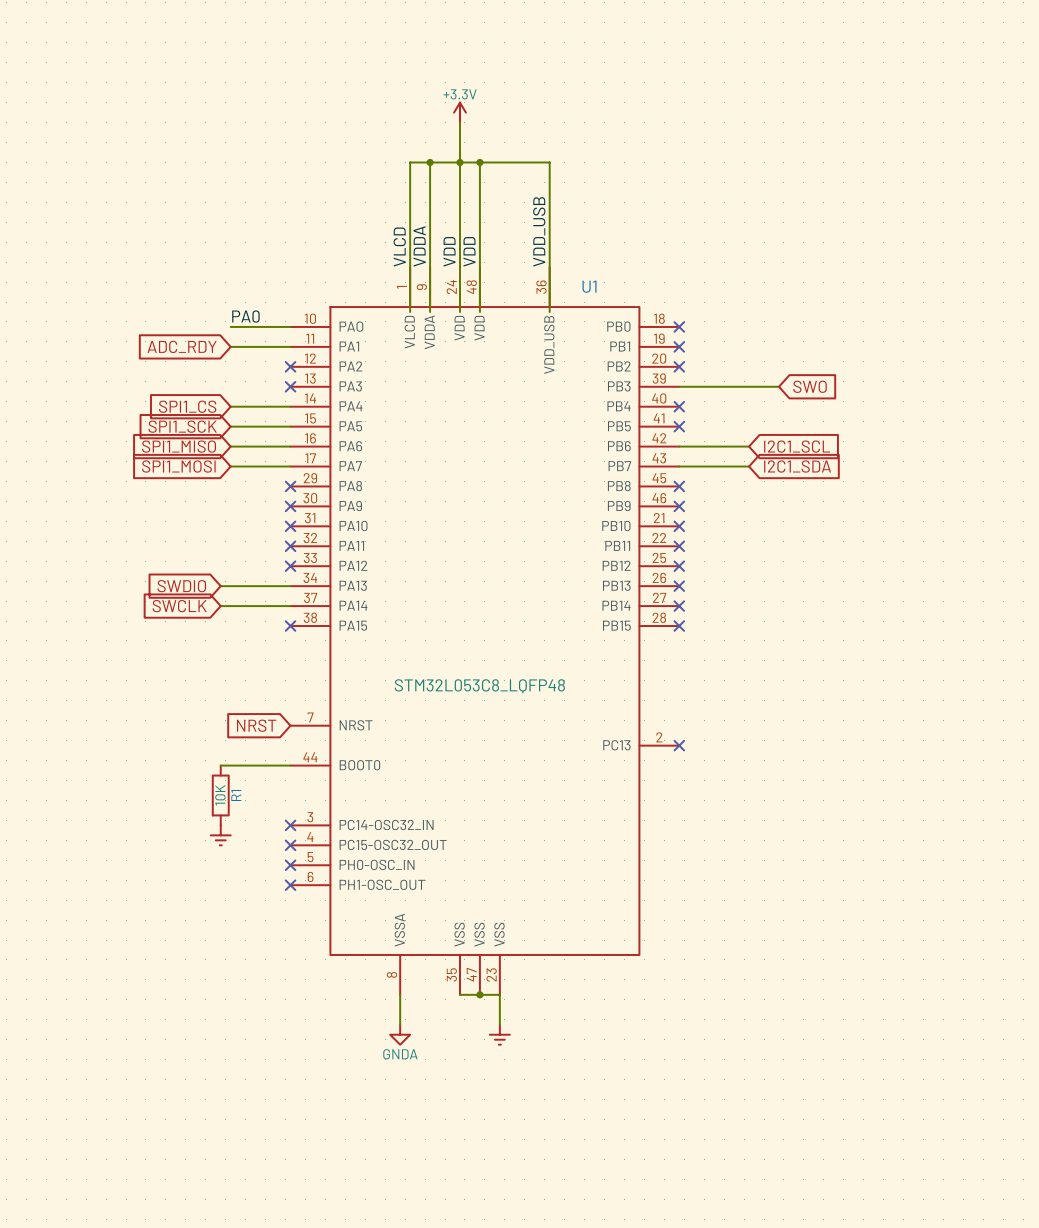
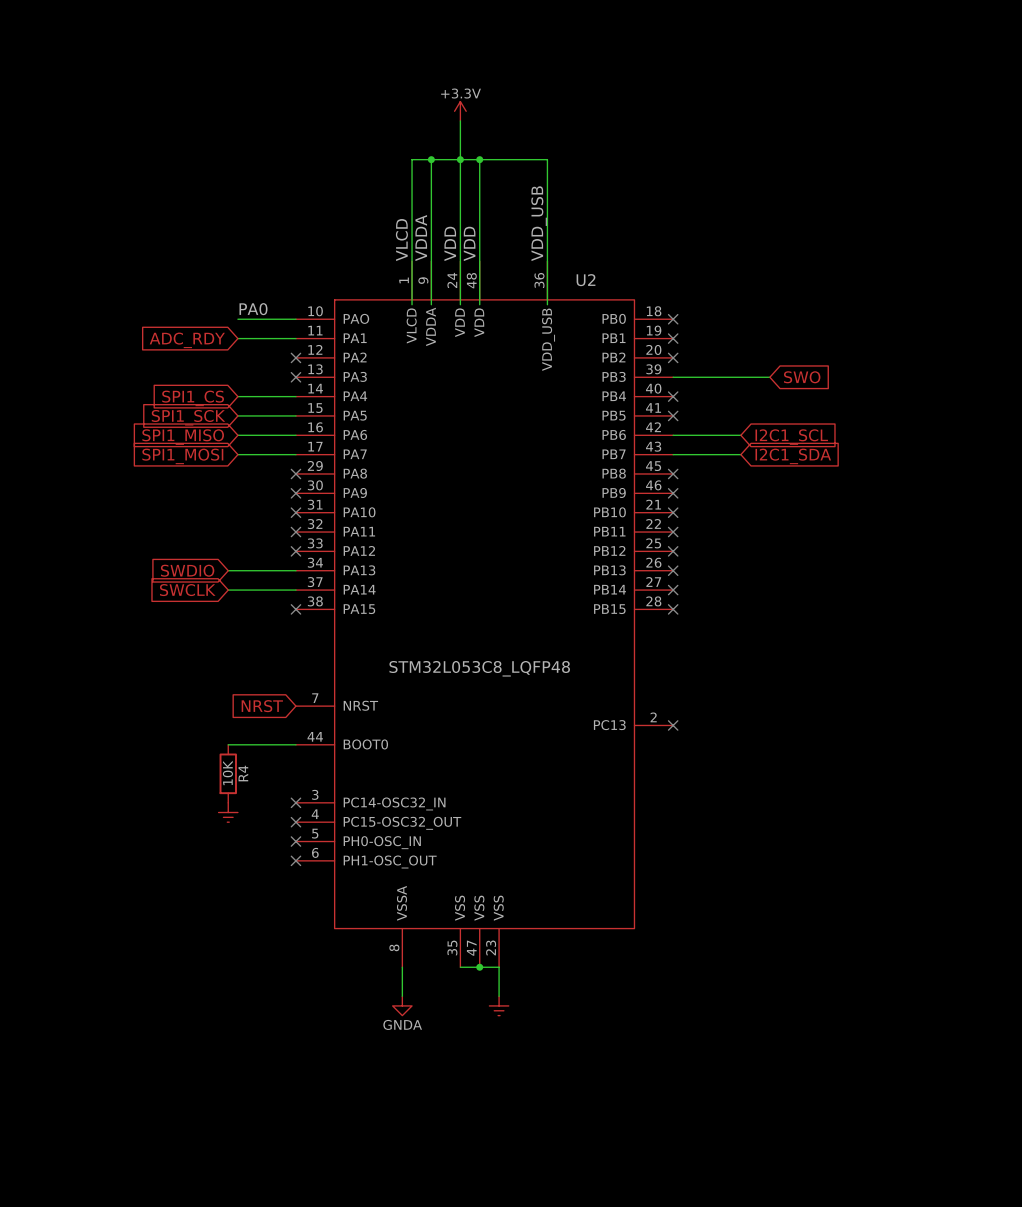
U1 name: U1 (589, 286) -> U2 (586, 280)
R1 name: R1 (236, 795) -> R4 (243, 773)

